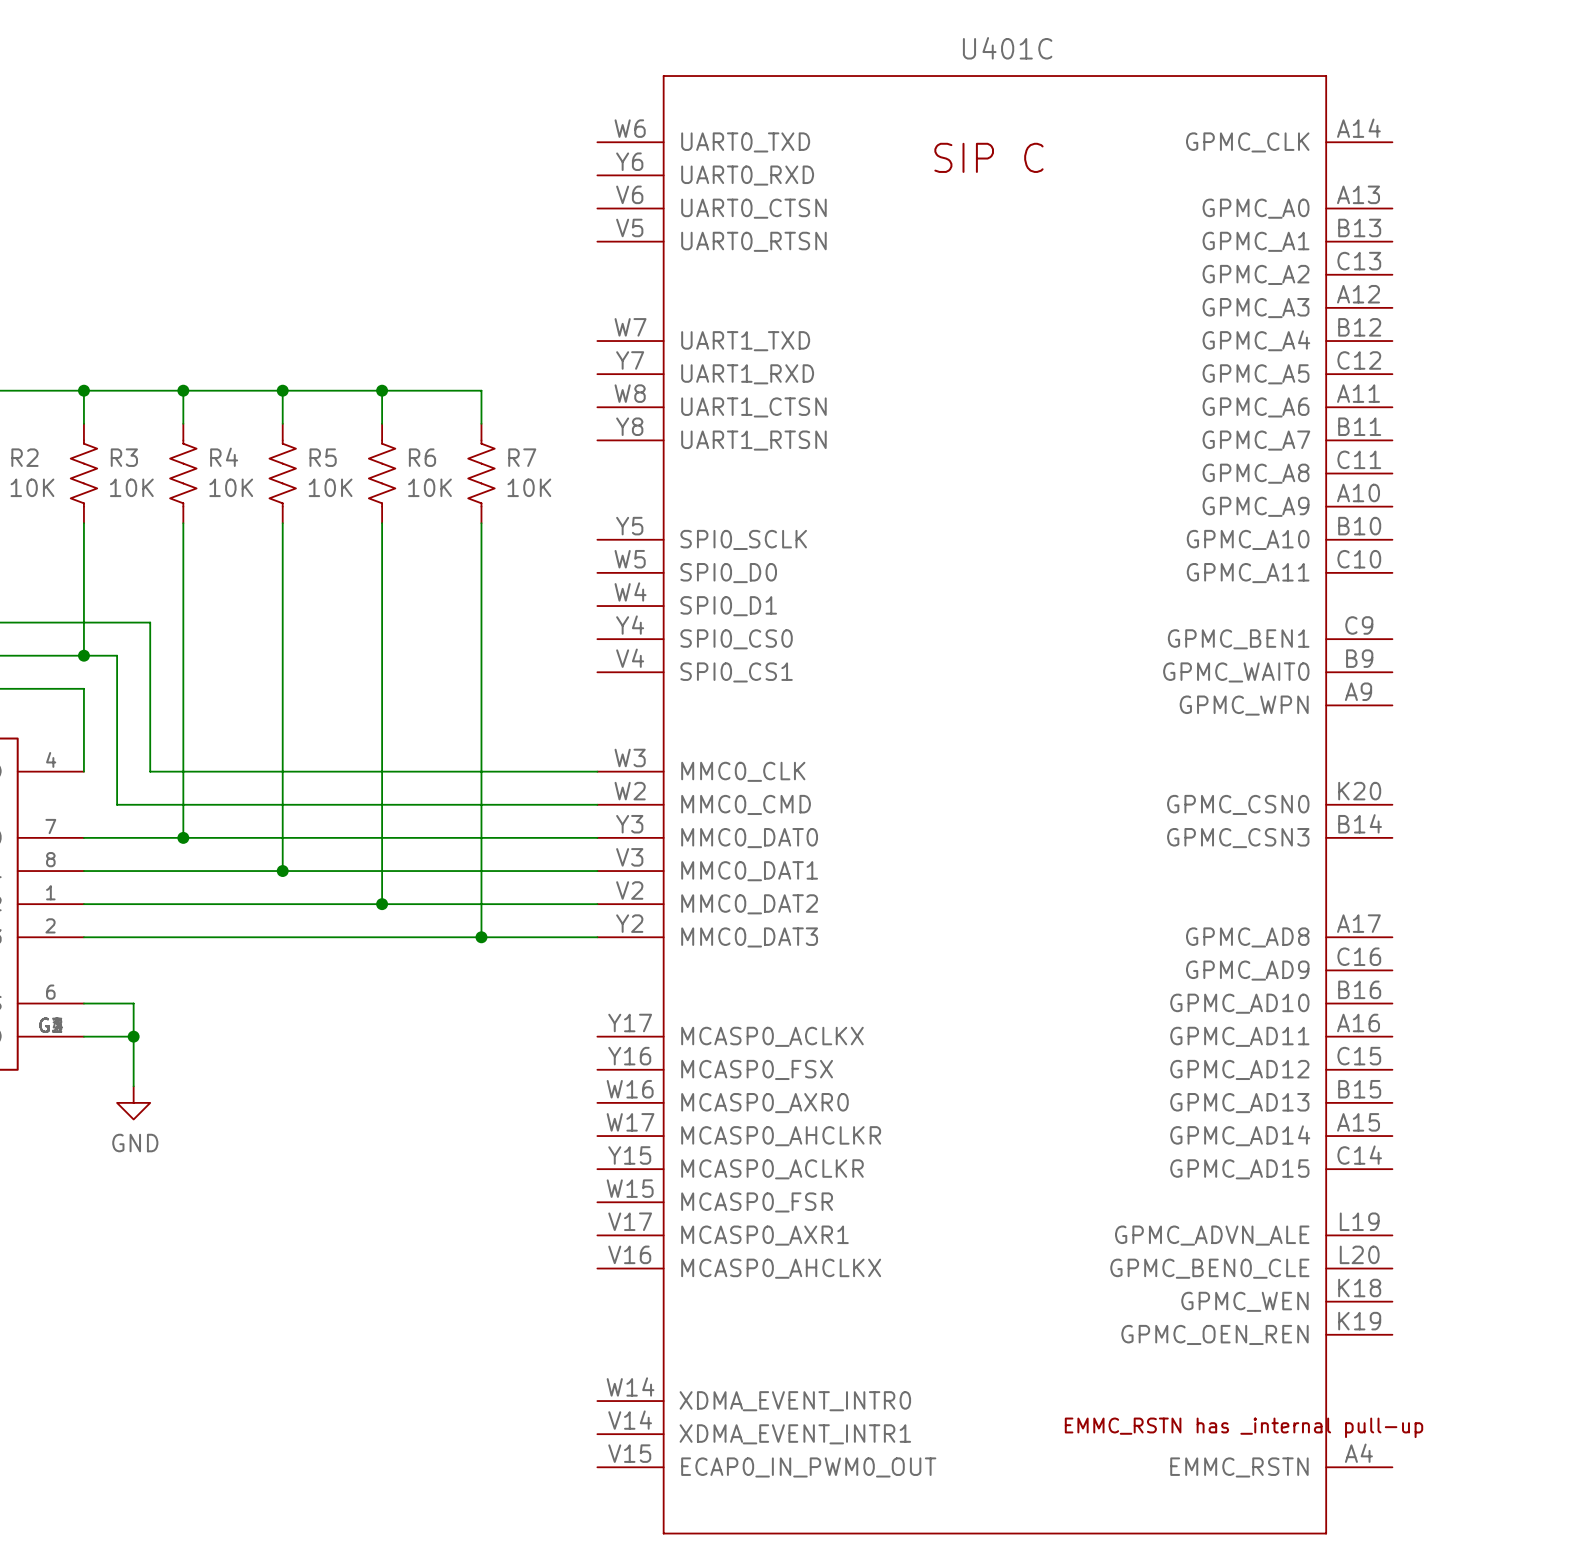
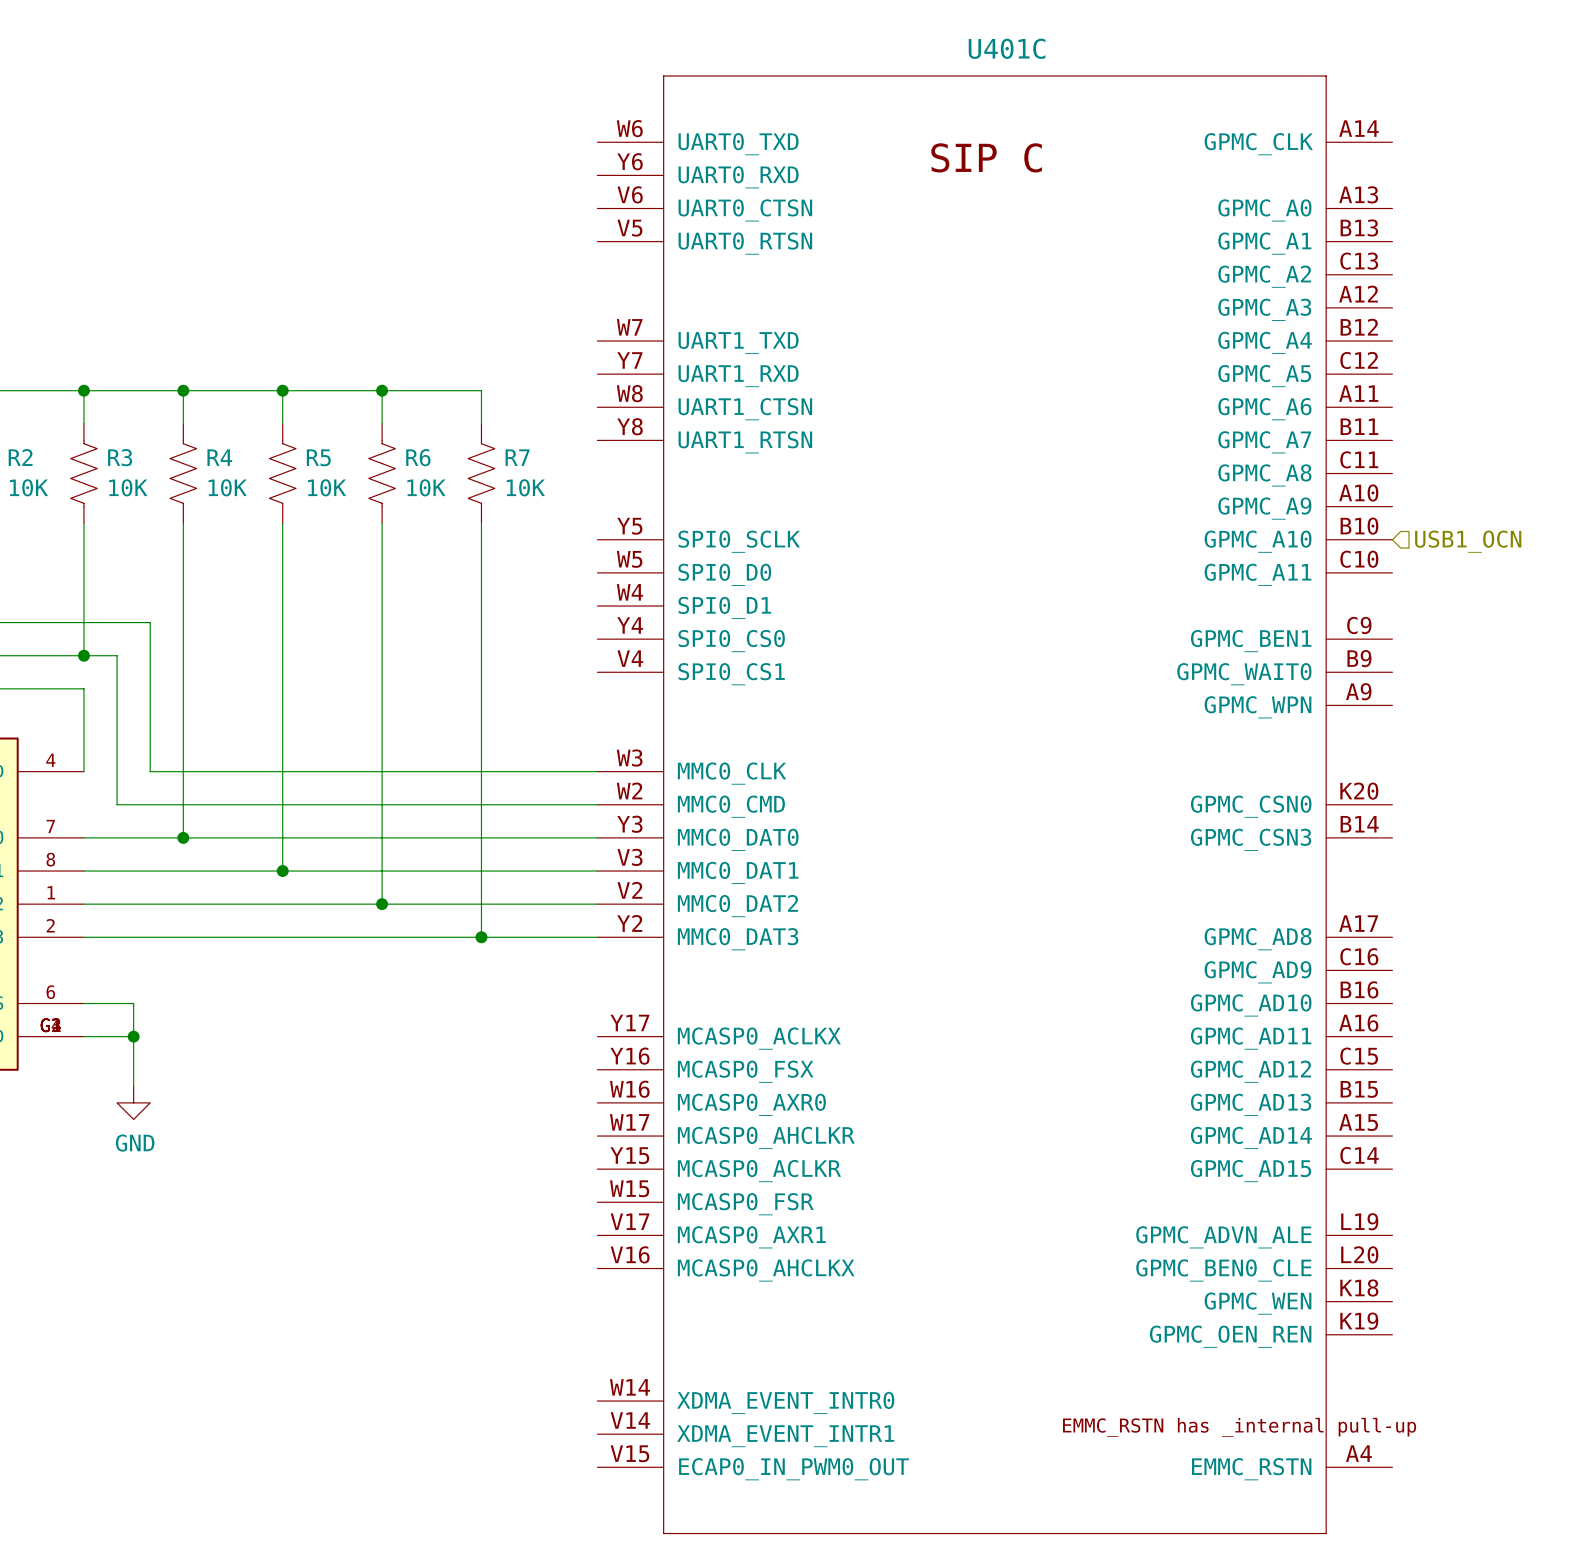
hierarchical label: none -> USB1_OCN (1468, 541)

